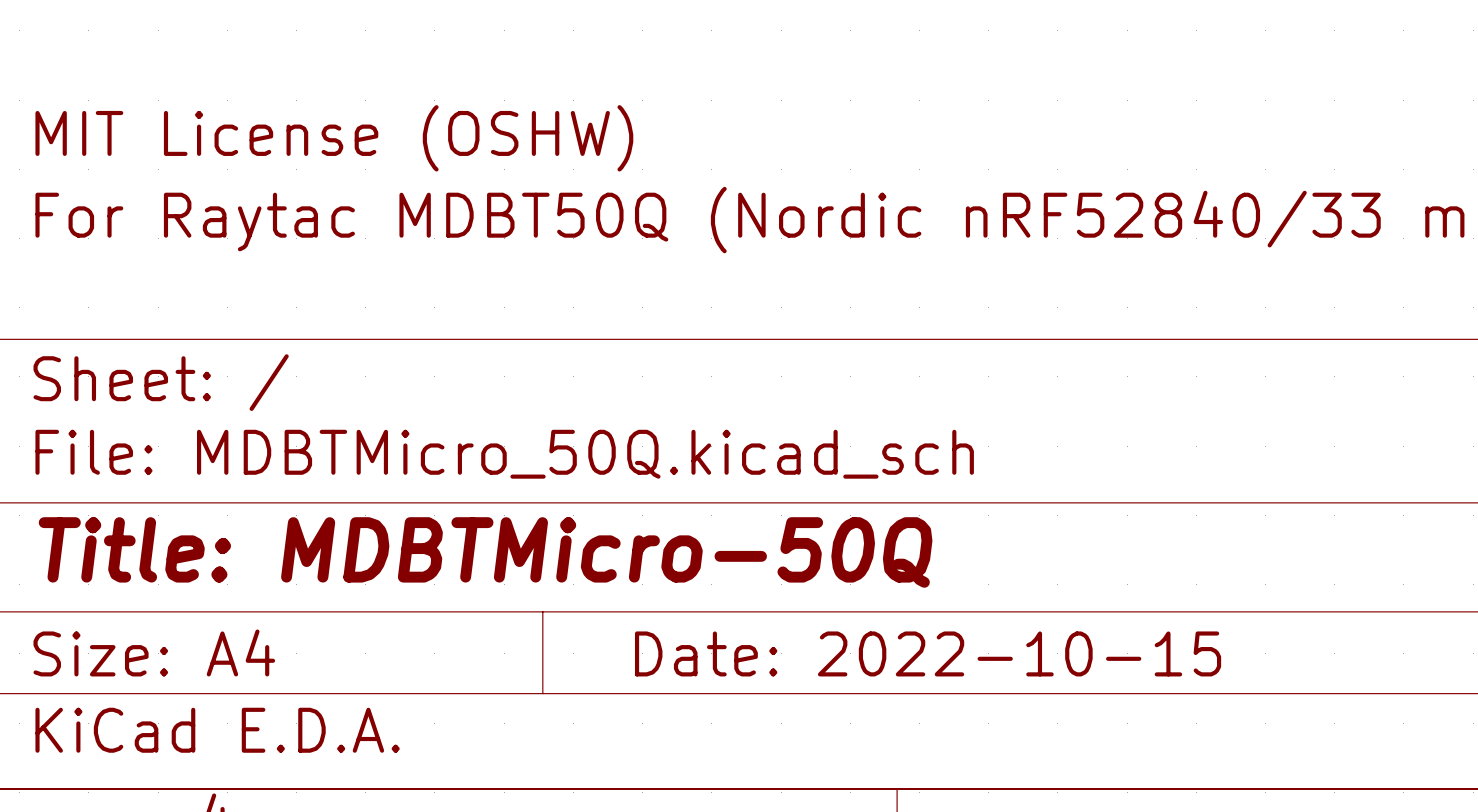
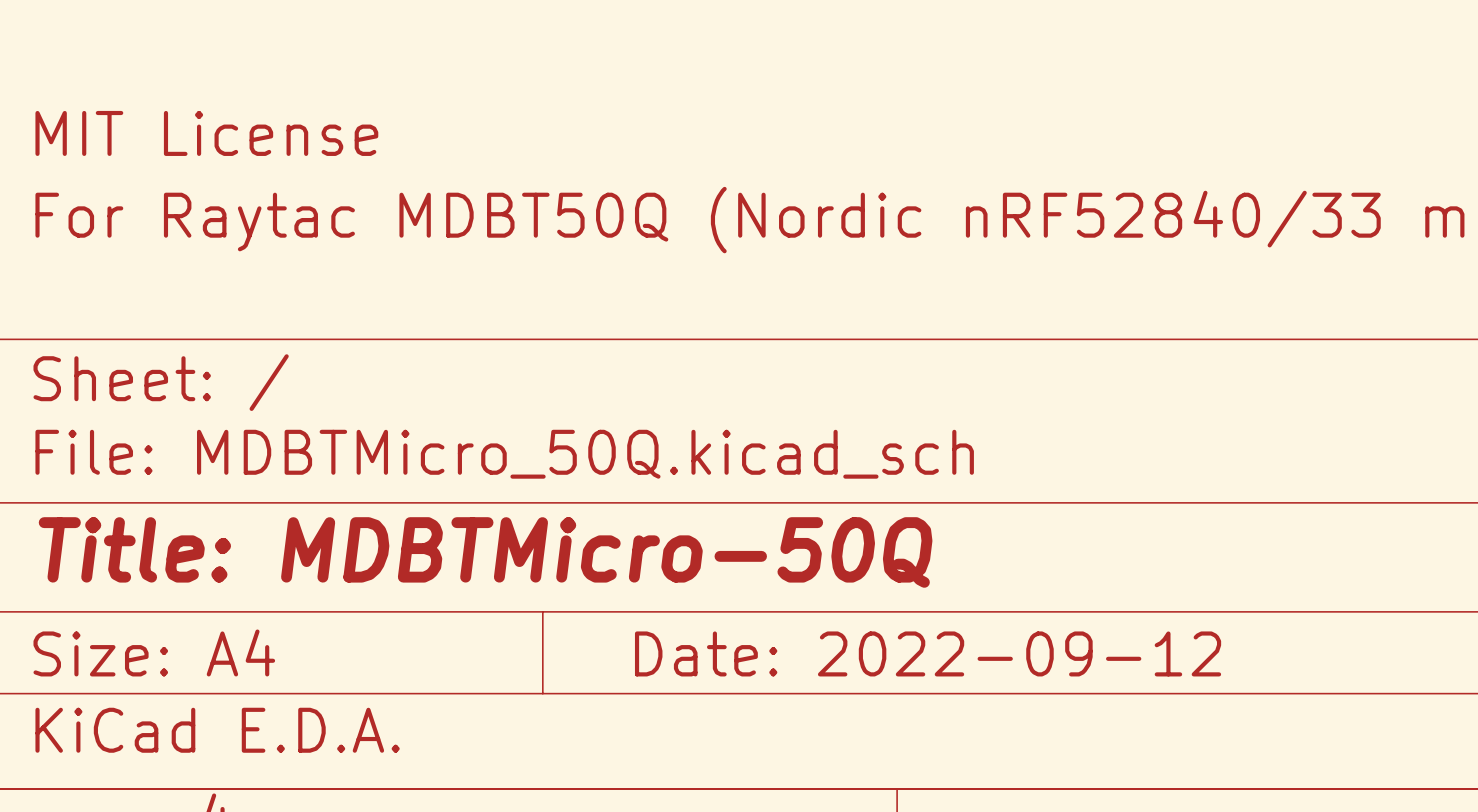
title block: MIT License (OSHW) (334, 138) -> MIT License (206, 133)
title block: Date: 2022-10-15 (928, 653) -> Date: 2022-09-12 (928, 653)

